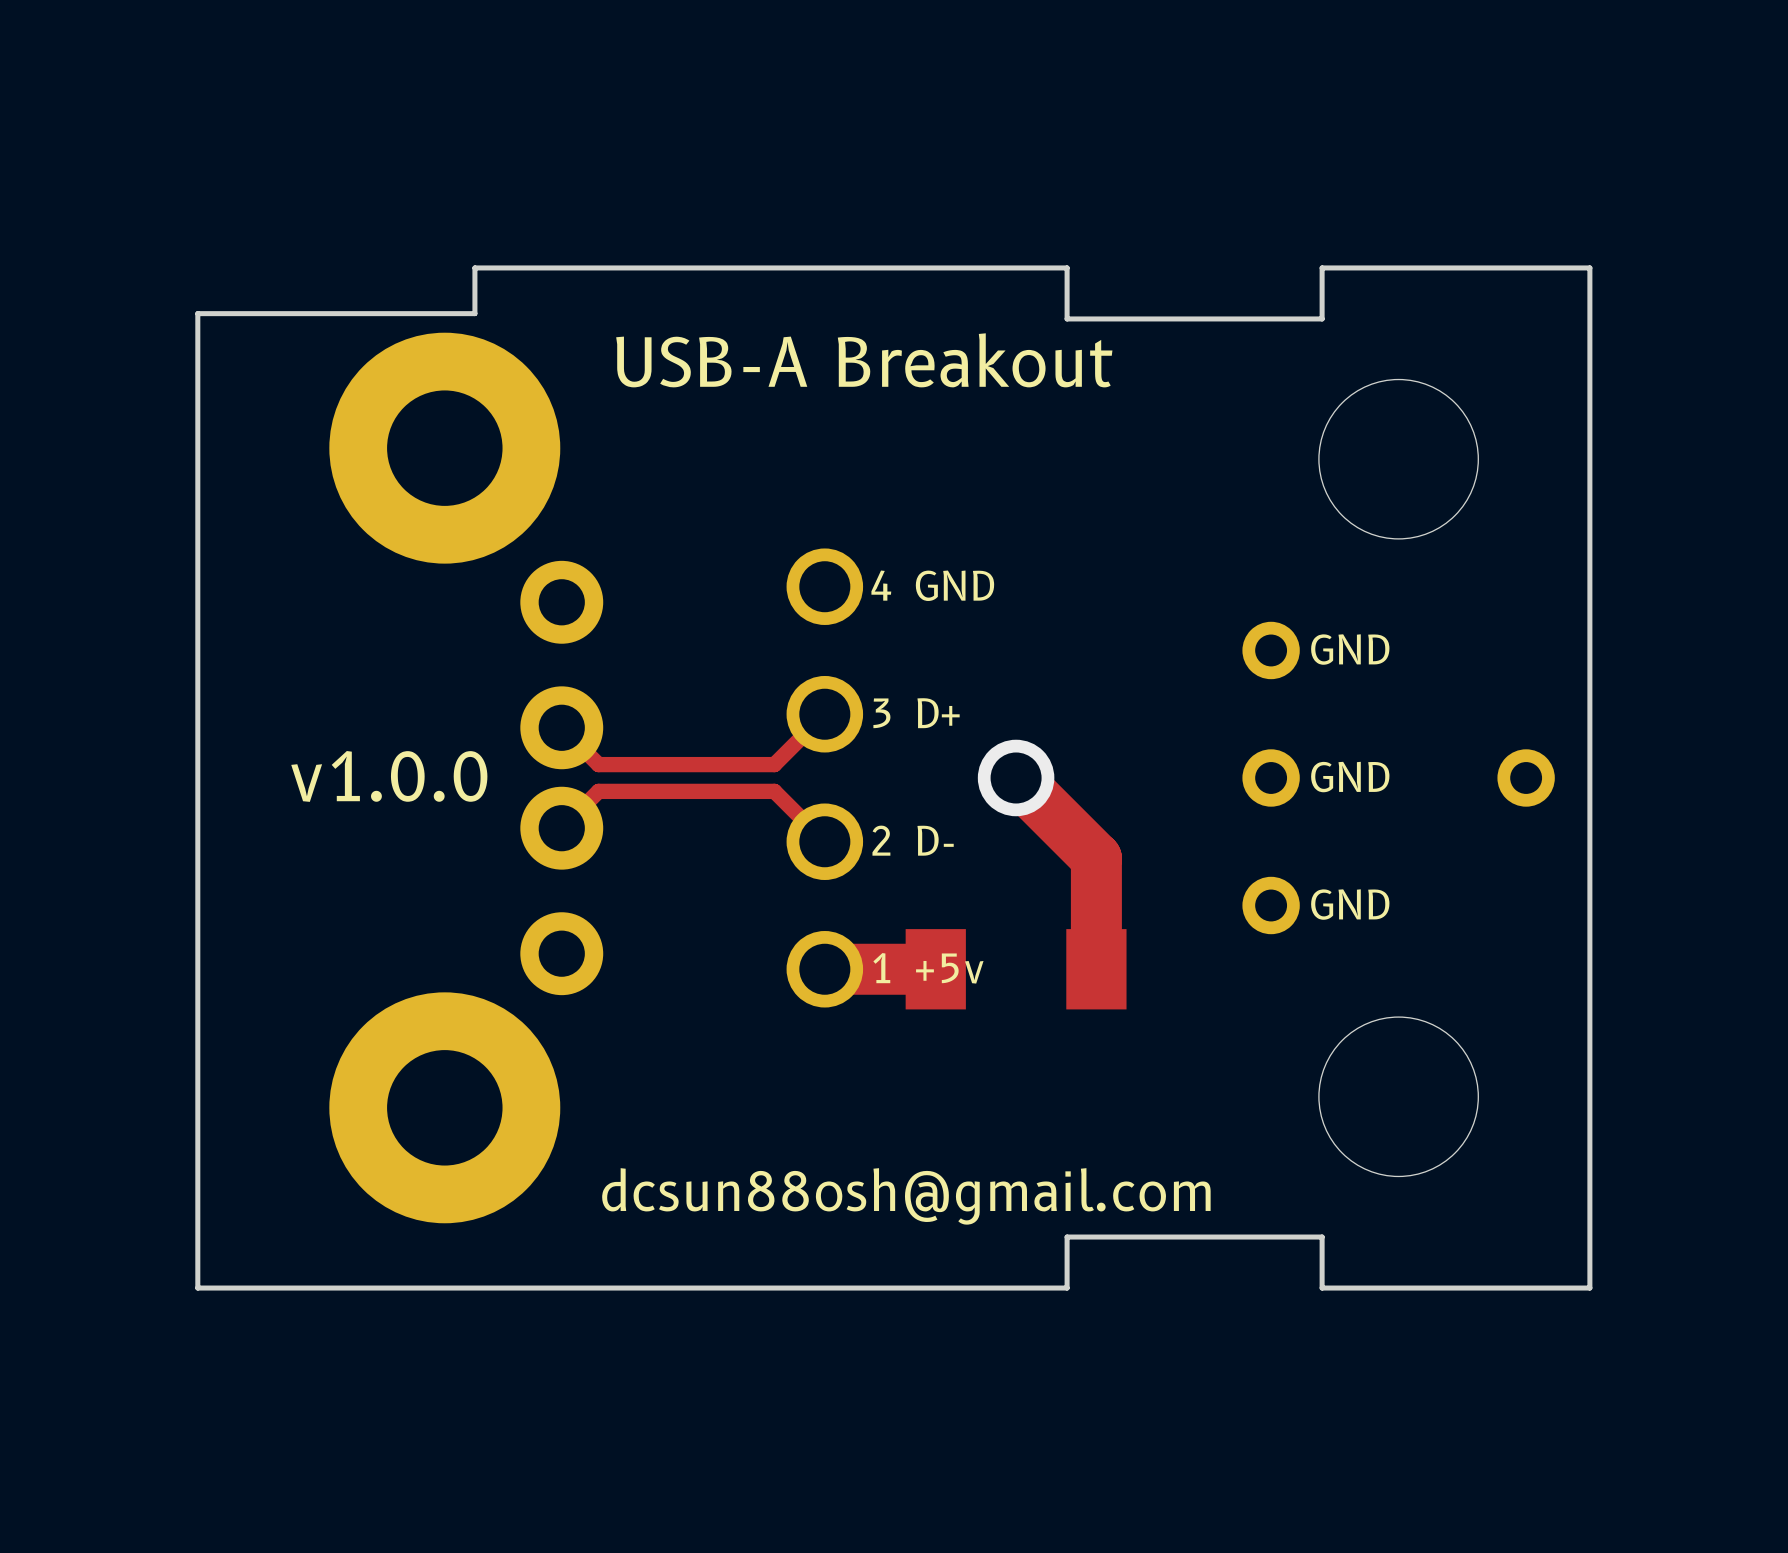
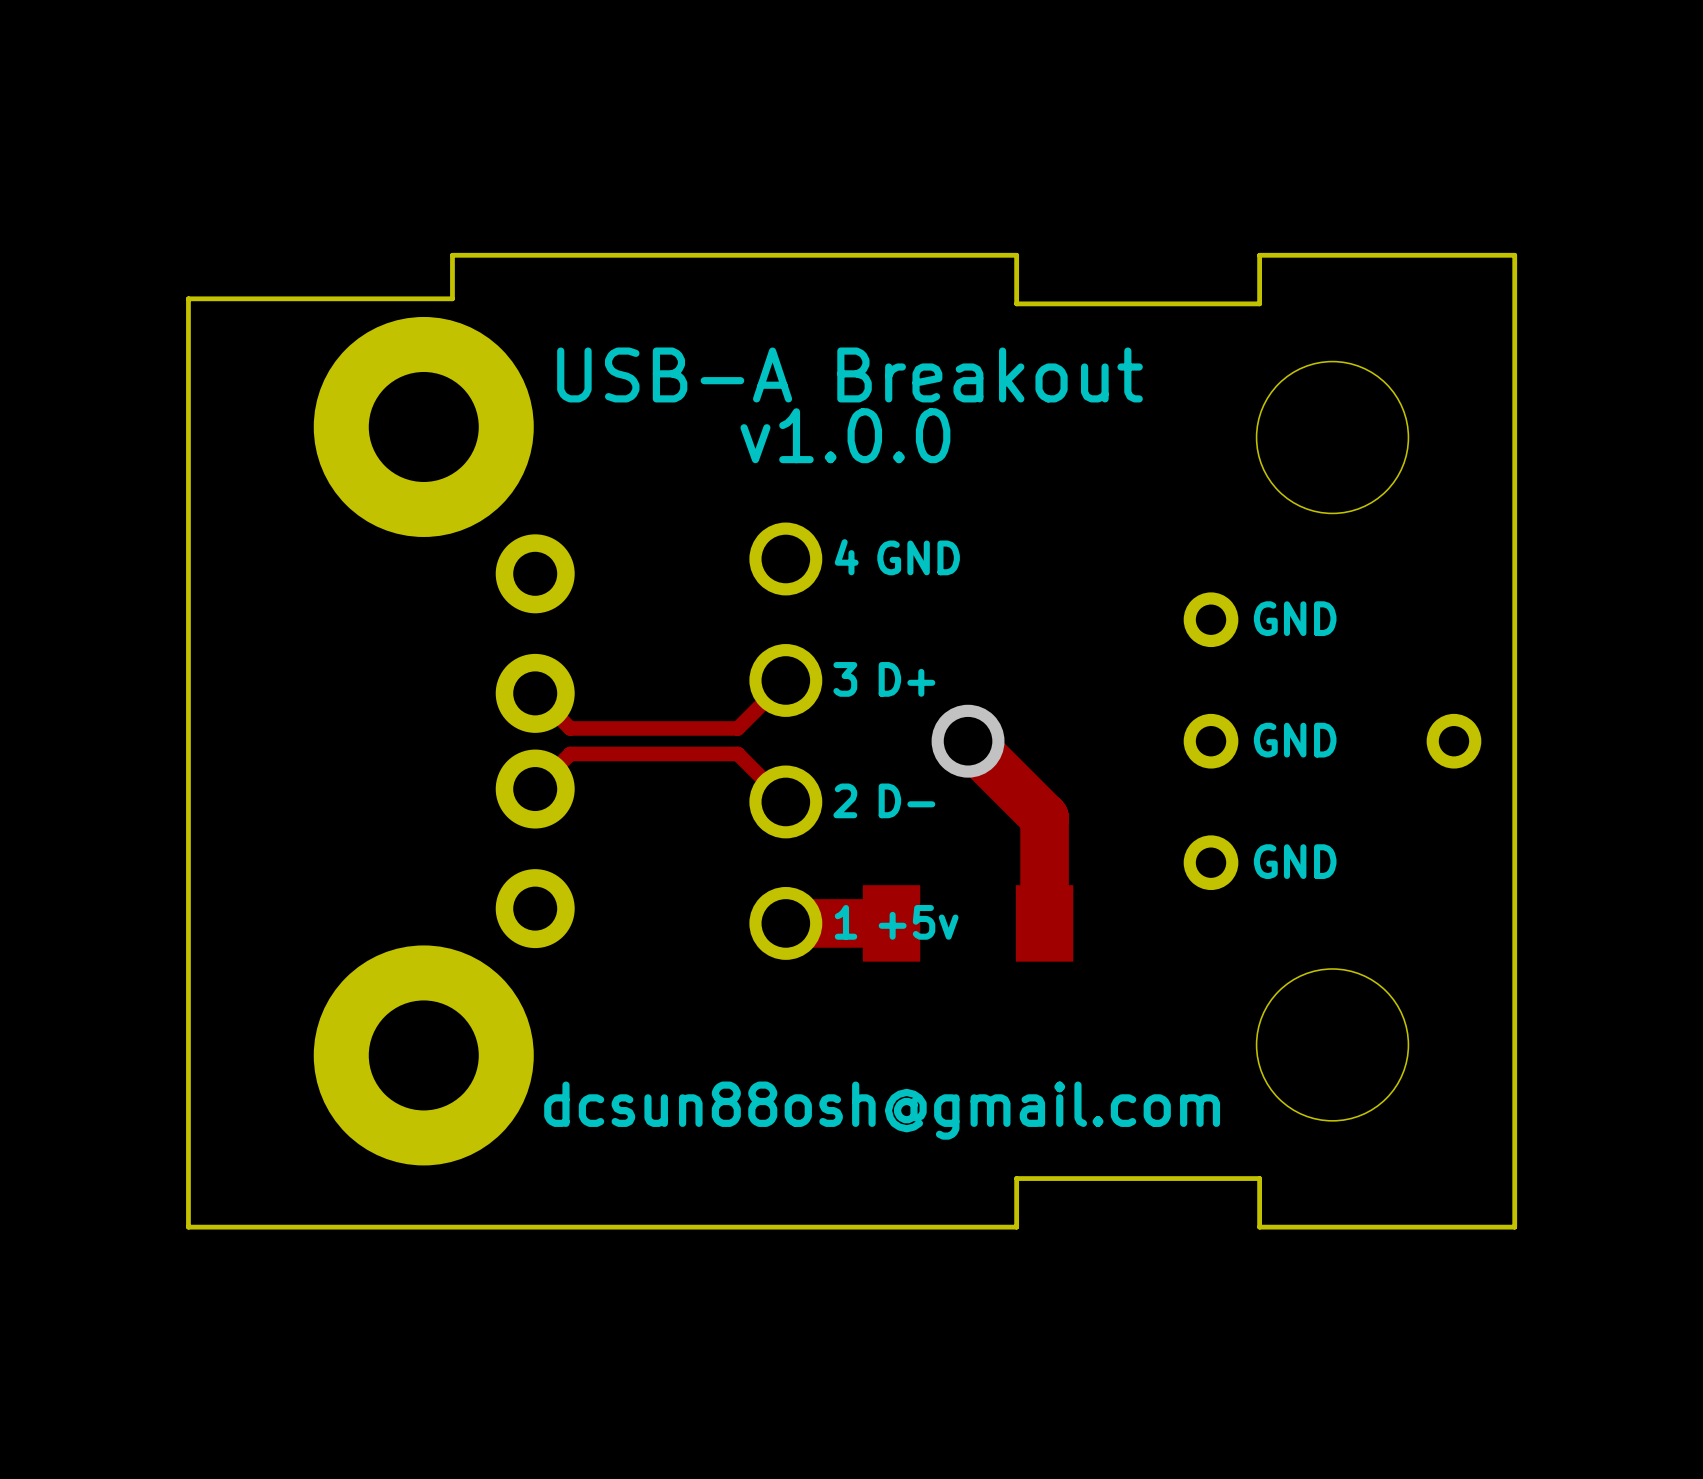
text position: USB-A Breakout (864, 360) -> USB-A Breakout (849, 374)
text position: v1.0.0 (389, 776) -> v1.0.0 (845, 435)
text position: dcsun88osh@gmail.com (906, 1196) -> dcsun88osh@gmail.com (882, 1110)

